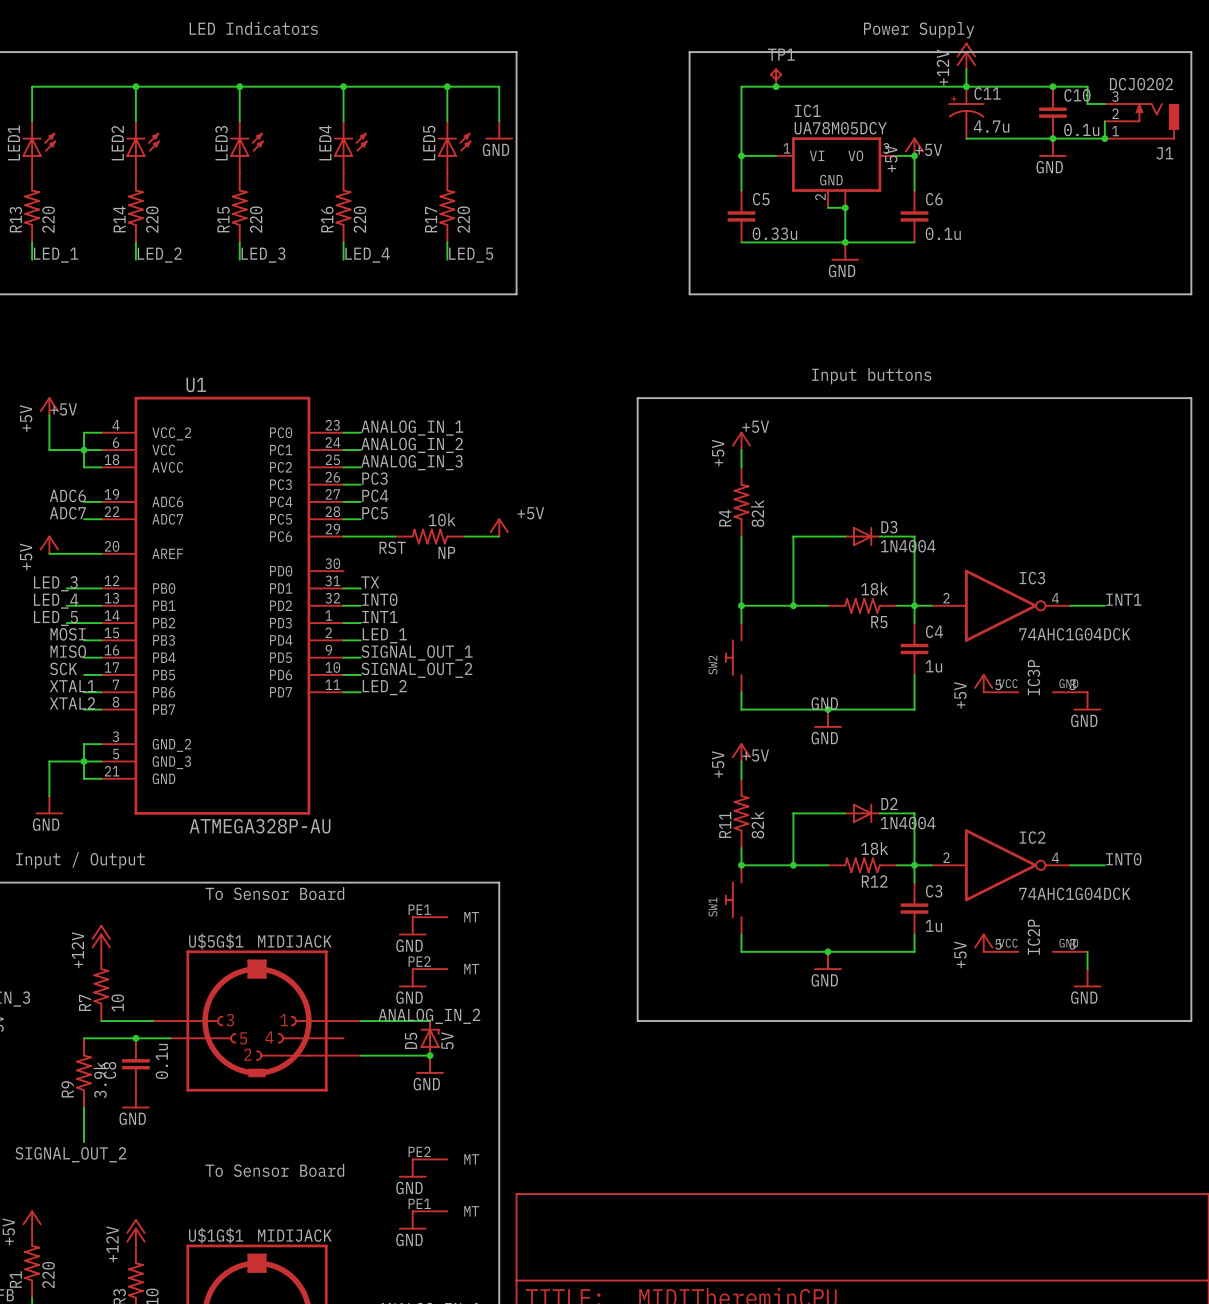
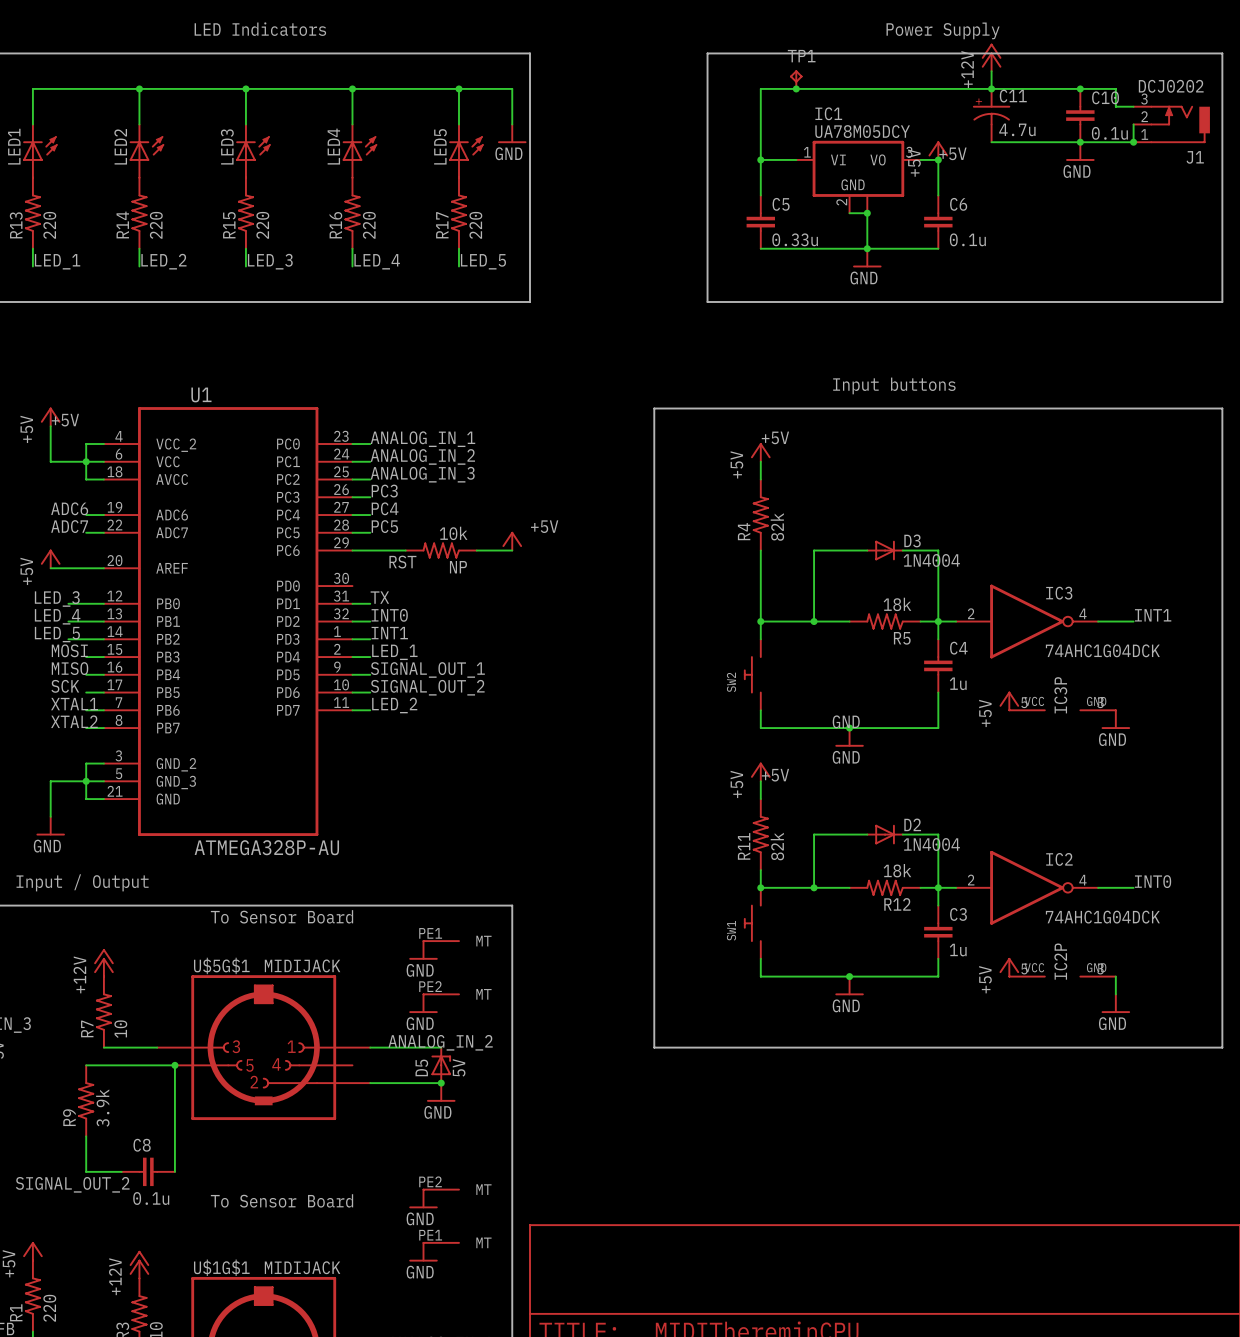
junction position: (135, 1038) -> (174, 1065)
wire: none -> (174, 1065) (174, 1171)
C8 rotation: 0° (135, 1064) -> 90° clockwise (148, 1171)
C8 position: (135, 1064) -> (148, 1171)
power symbol: GND (135, 1099) -> none
wire: none -> (86, 1171) (121, 1171)

